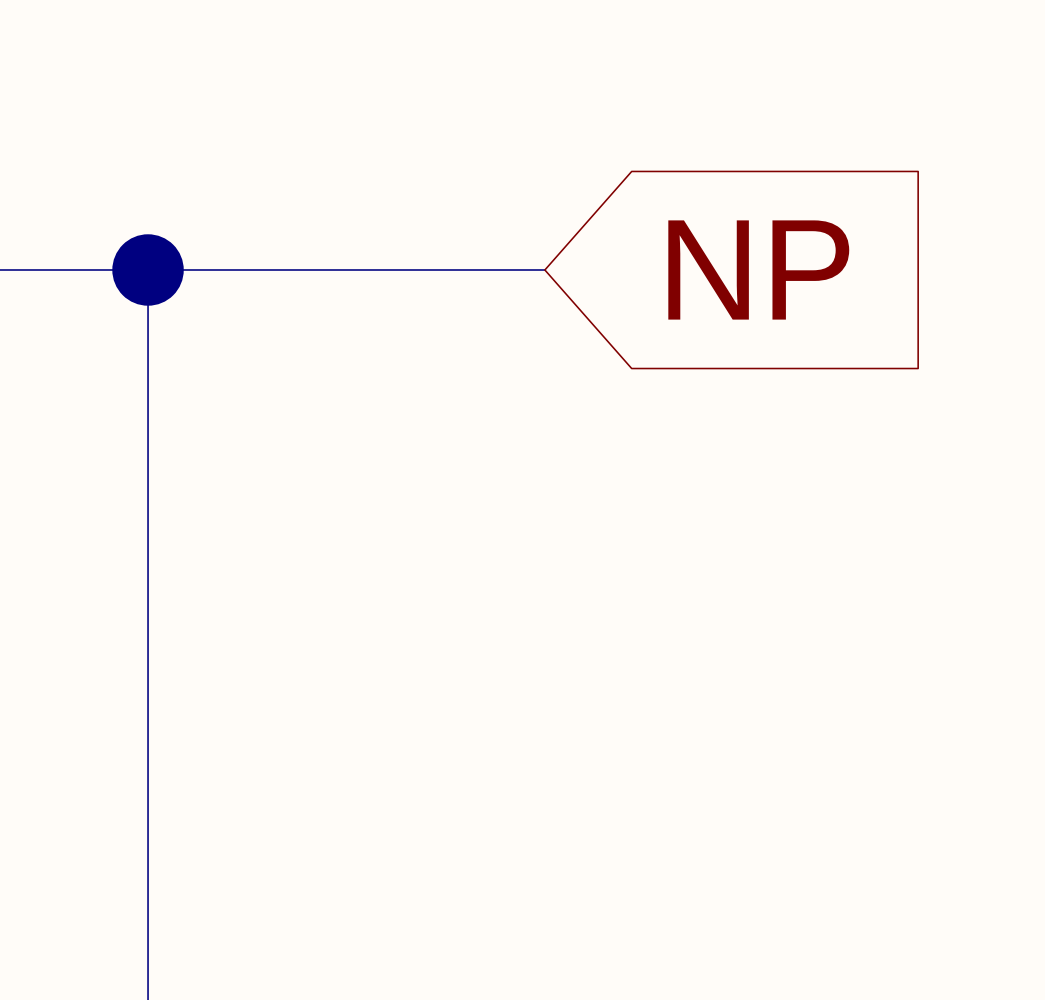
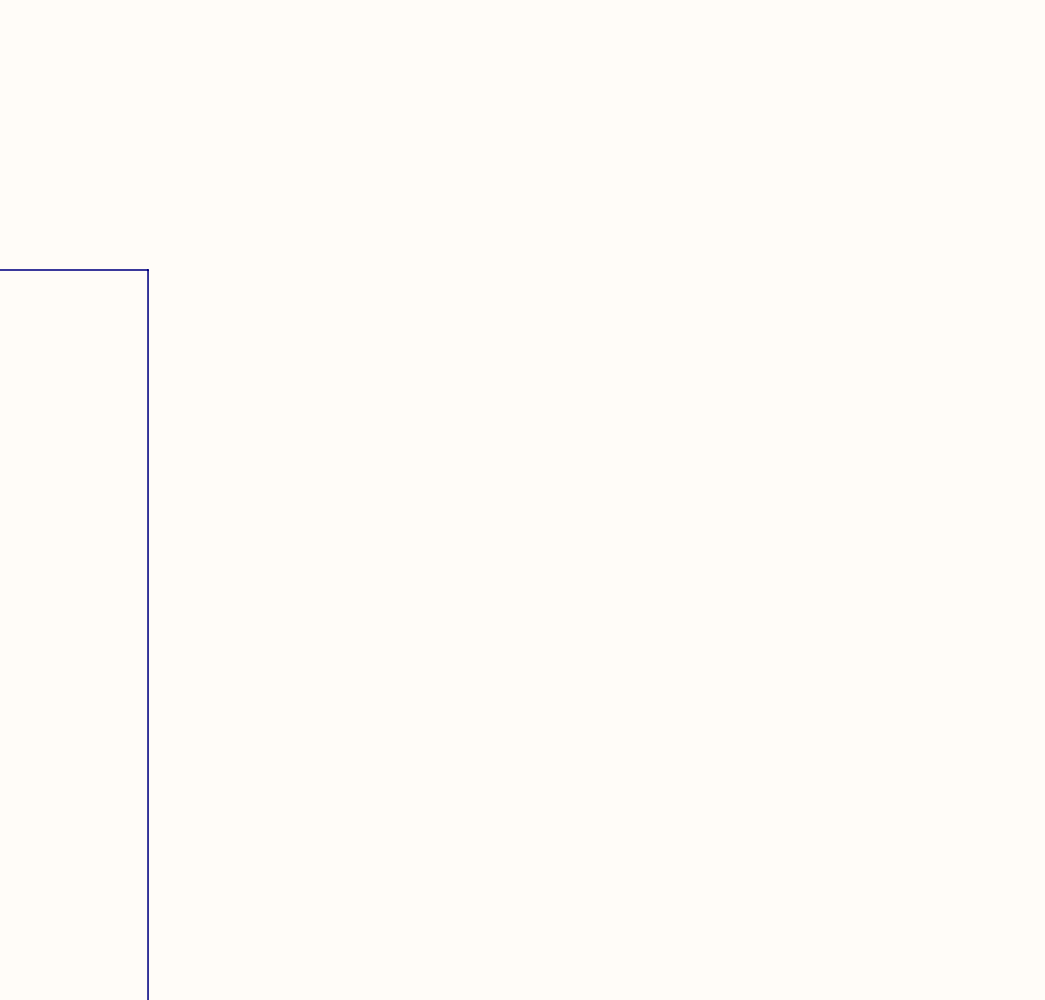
wire: (148, 269) (544, 269) -> none
junction: (148, 269) -> none
global label: NP (758, 269) -> none

